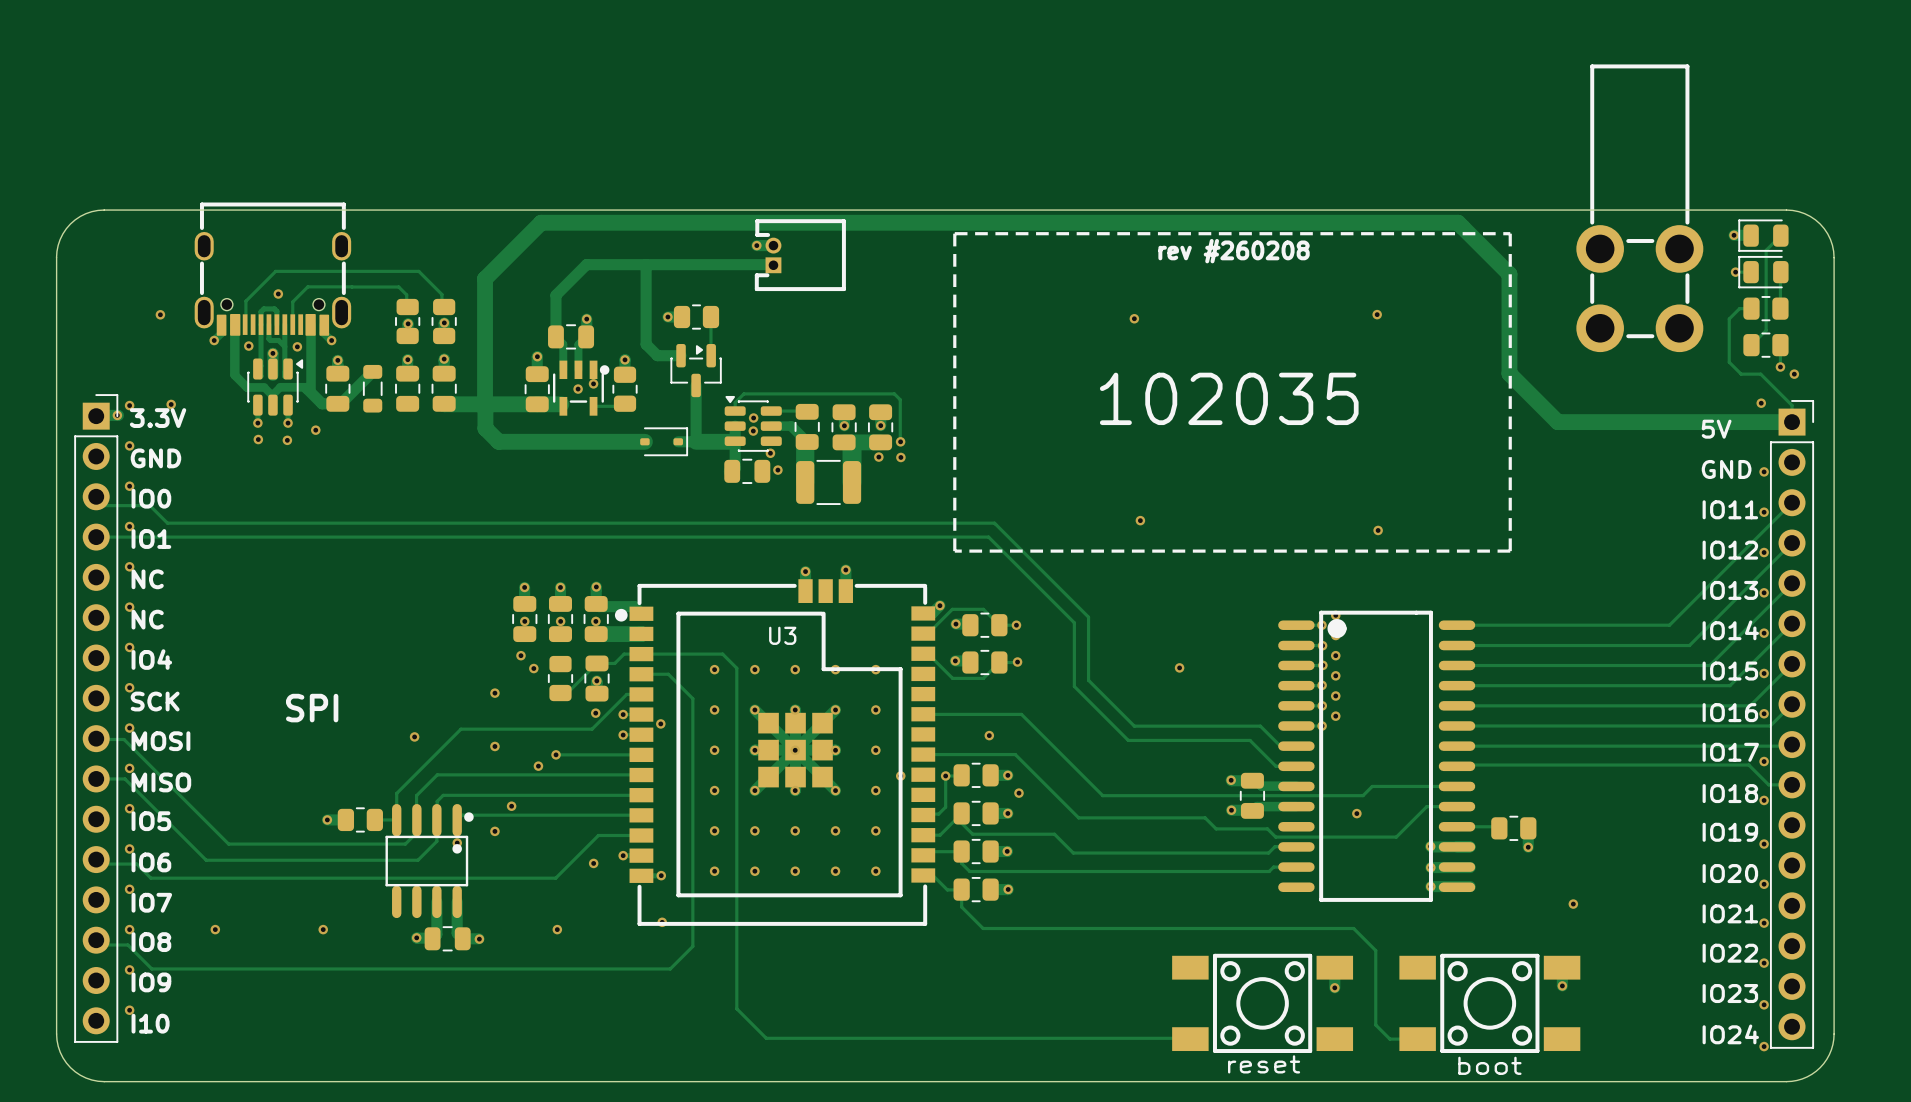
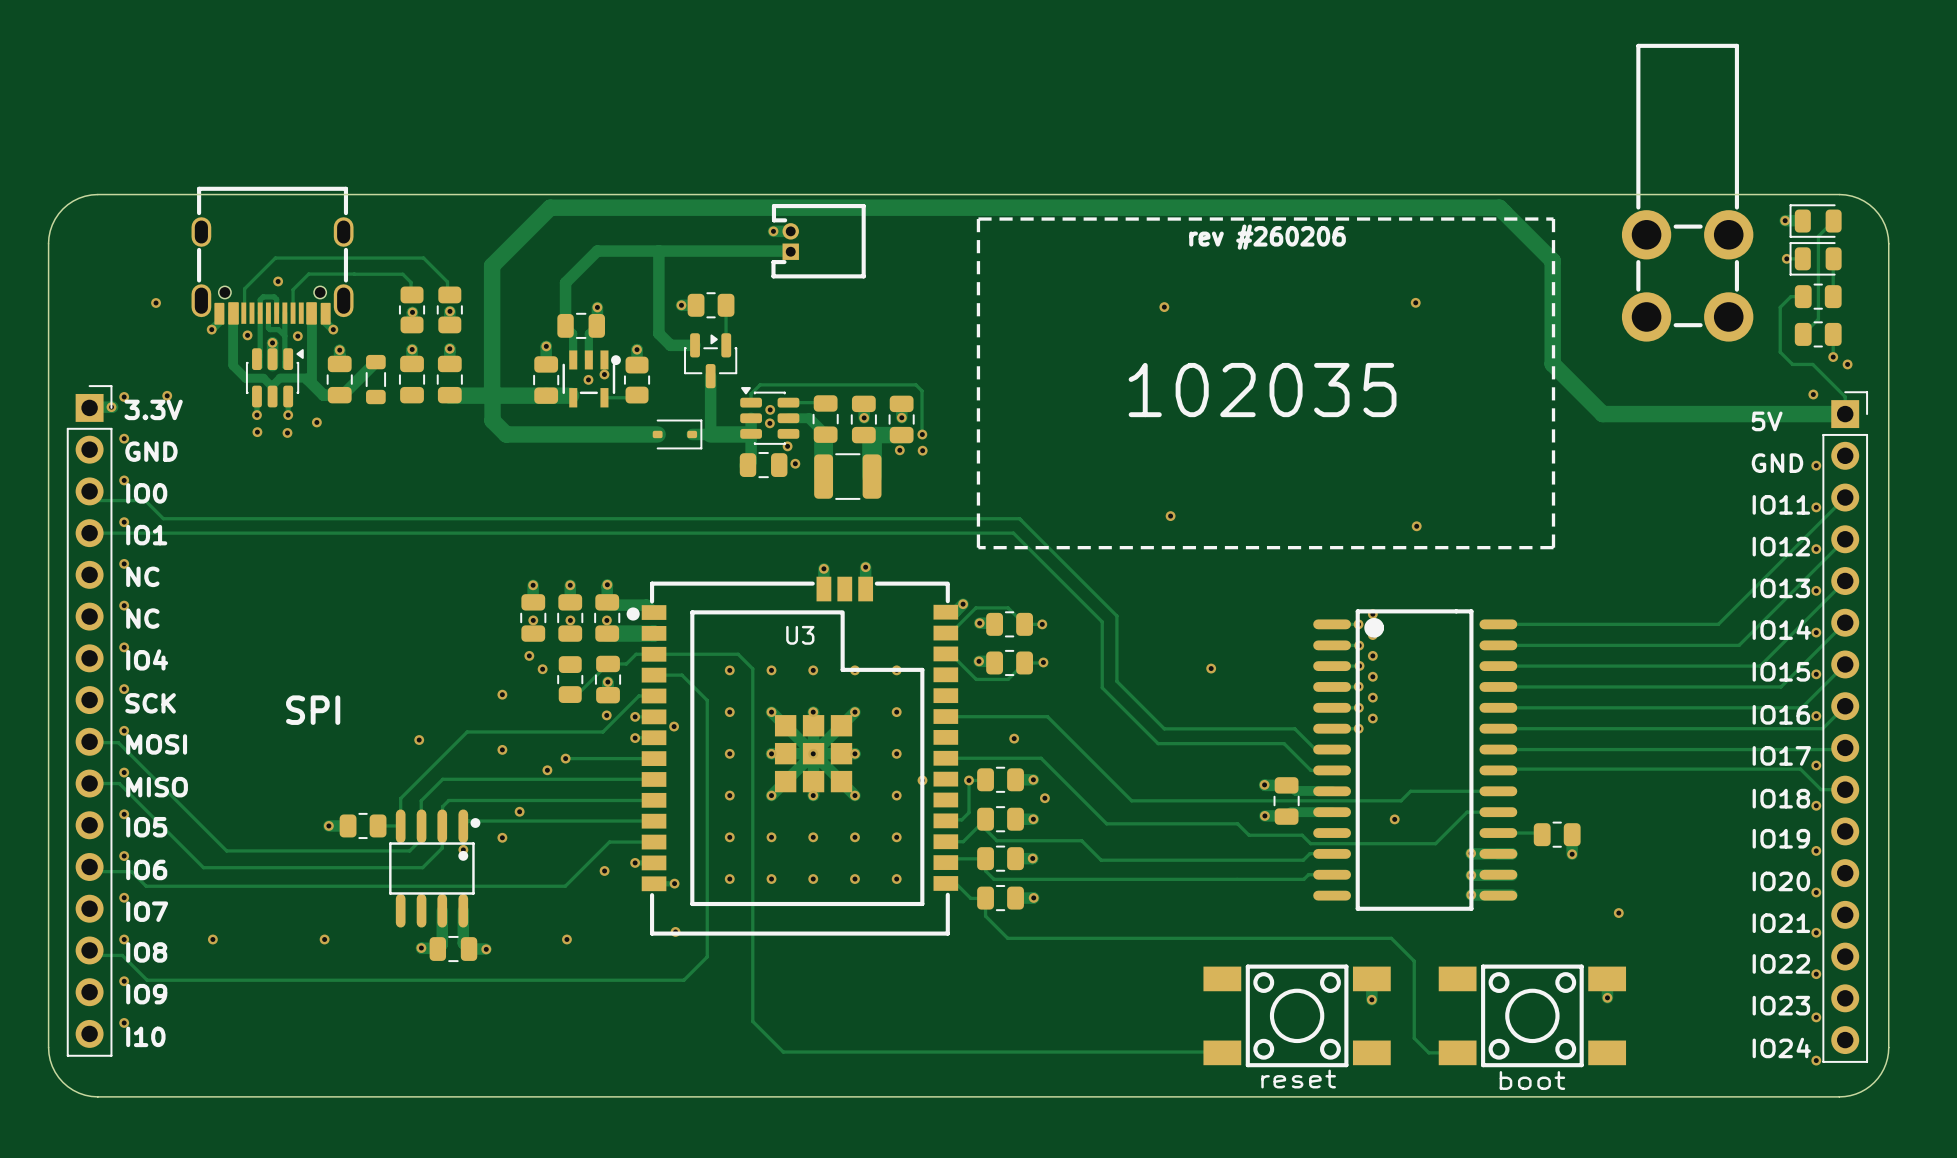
text: rev #260208 (1234, 251) -> rev #260206 (1267, 237)

